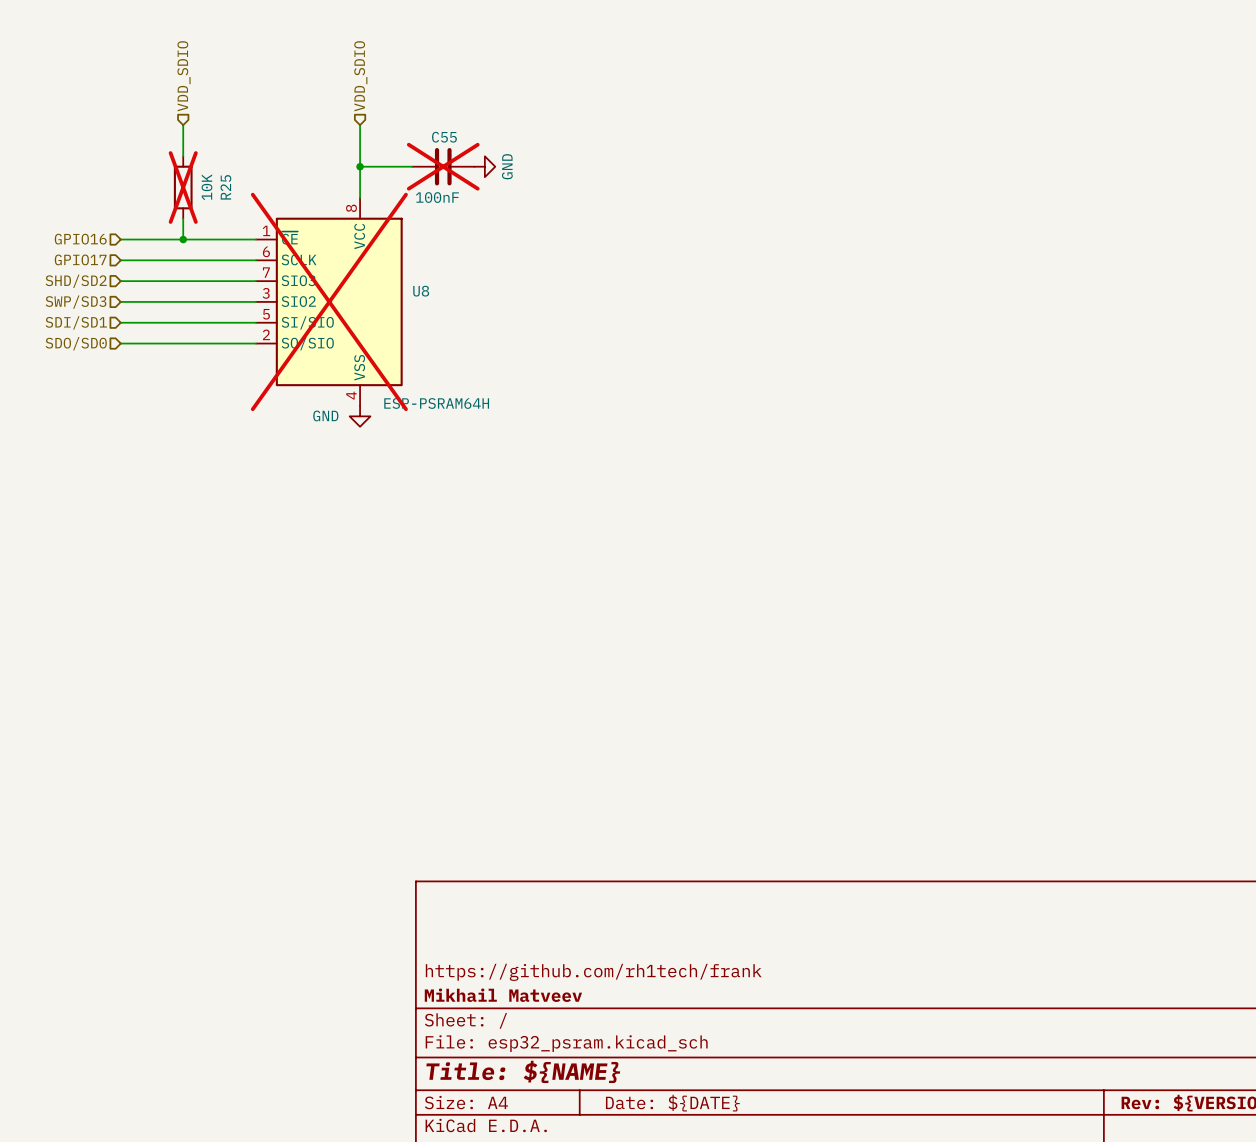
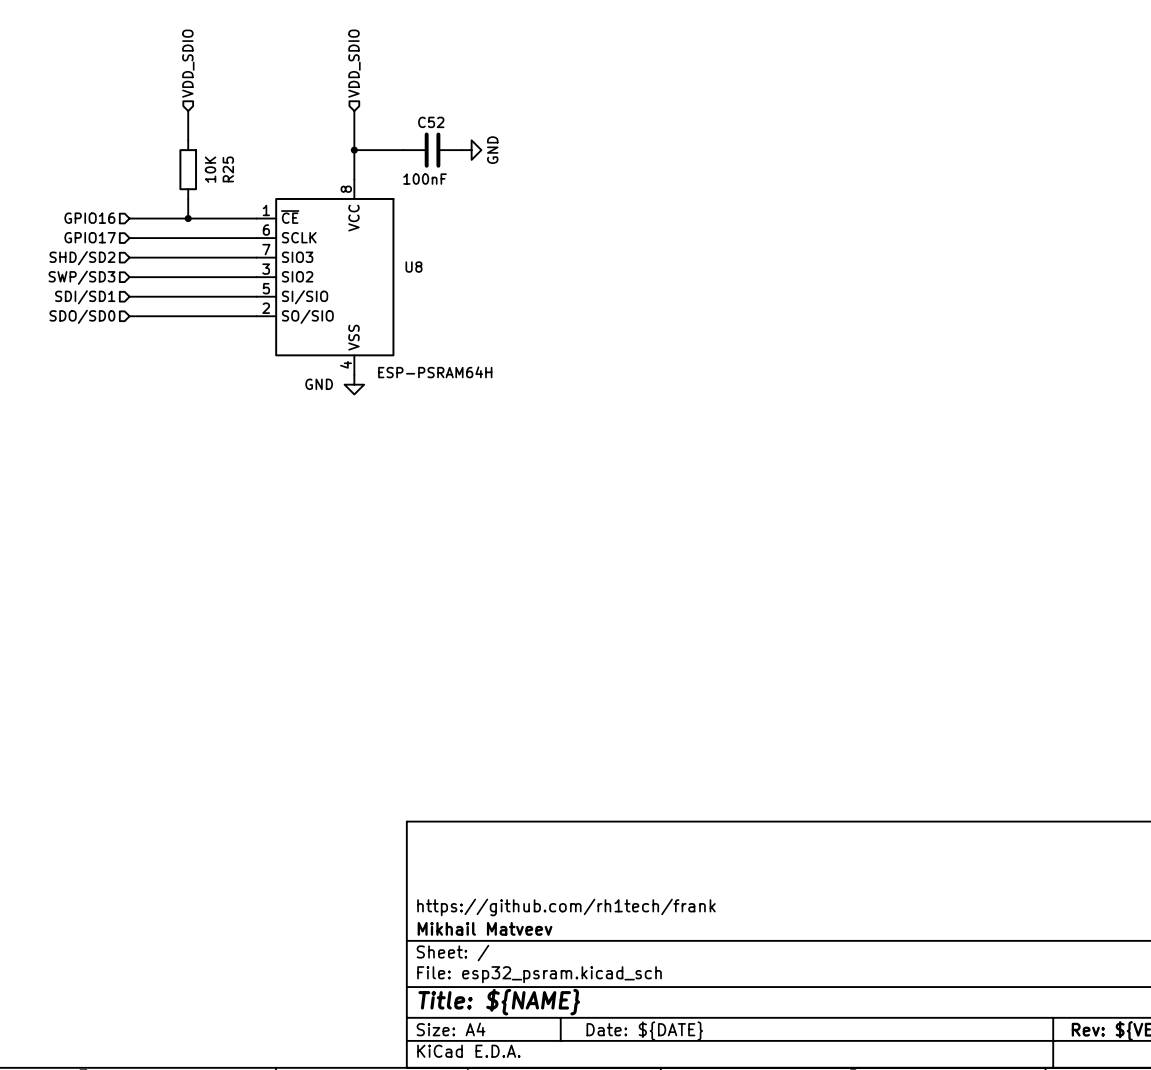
C55 name: C55 (444, 137) -> C52 (431, 122)
C55 do-not-place cross: (443, 166) -> none
R25 do-not-place cross: (183, 187) -> none
U8 do-not-place cross: (329, 301) -> none

